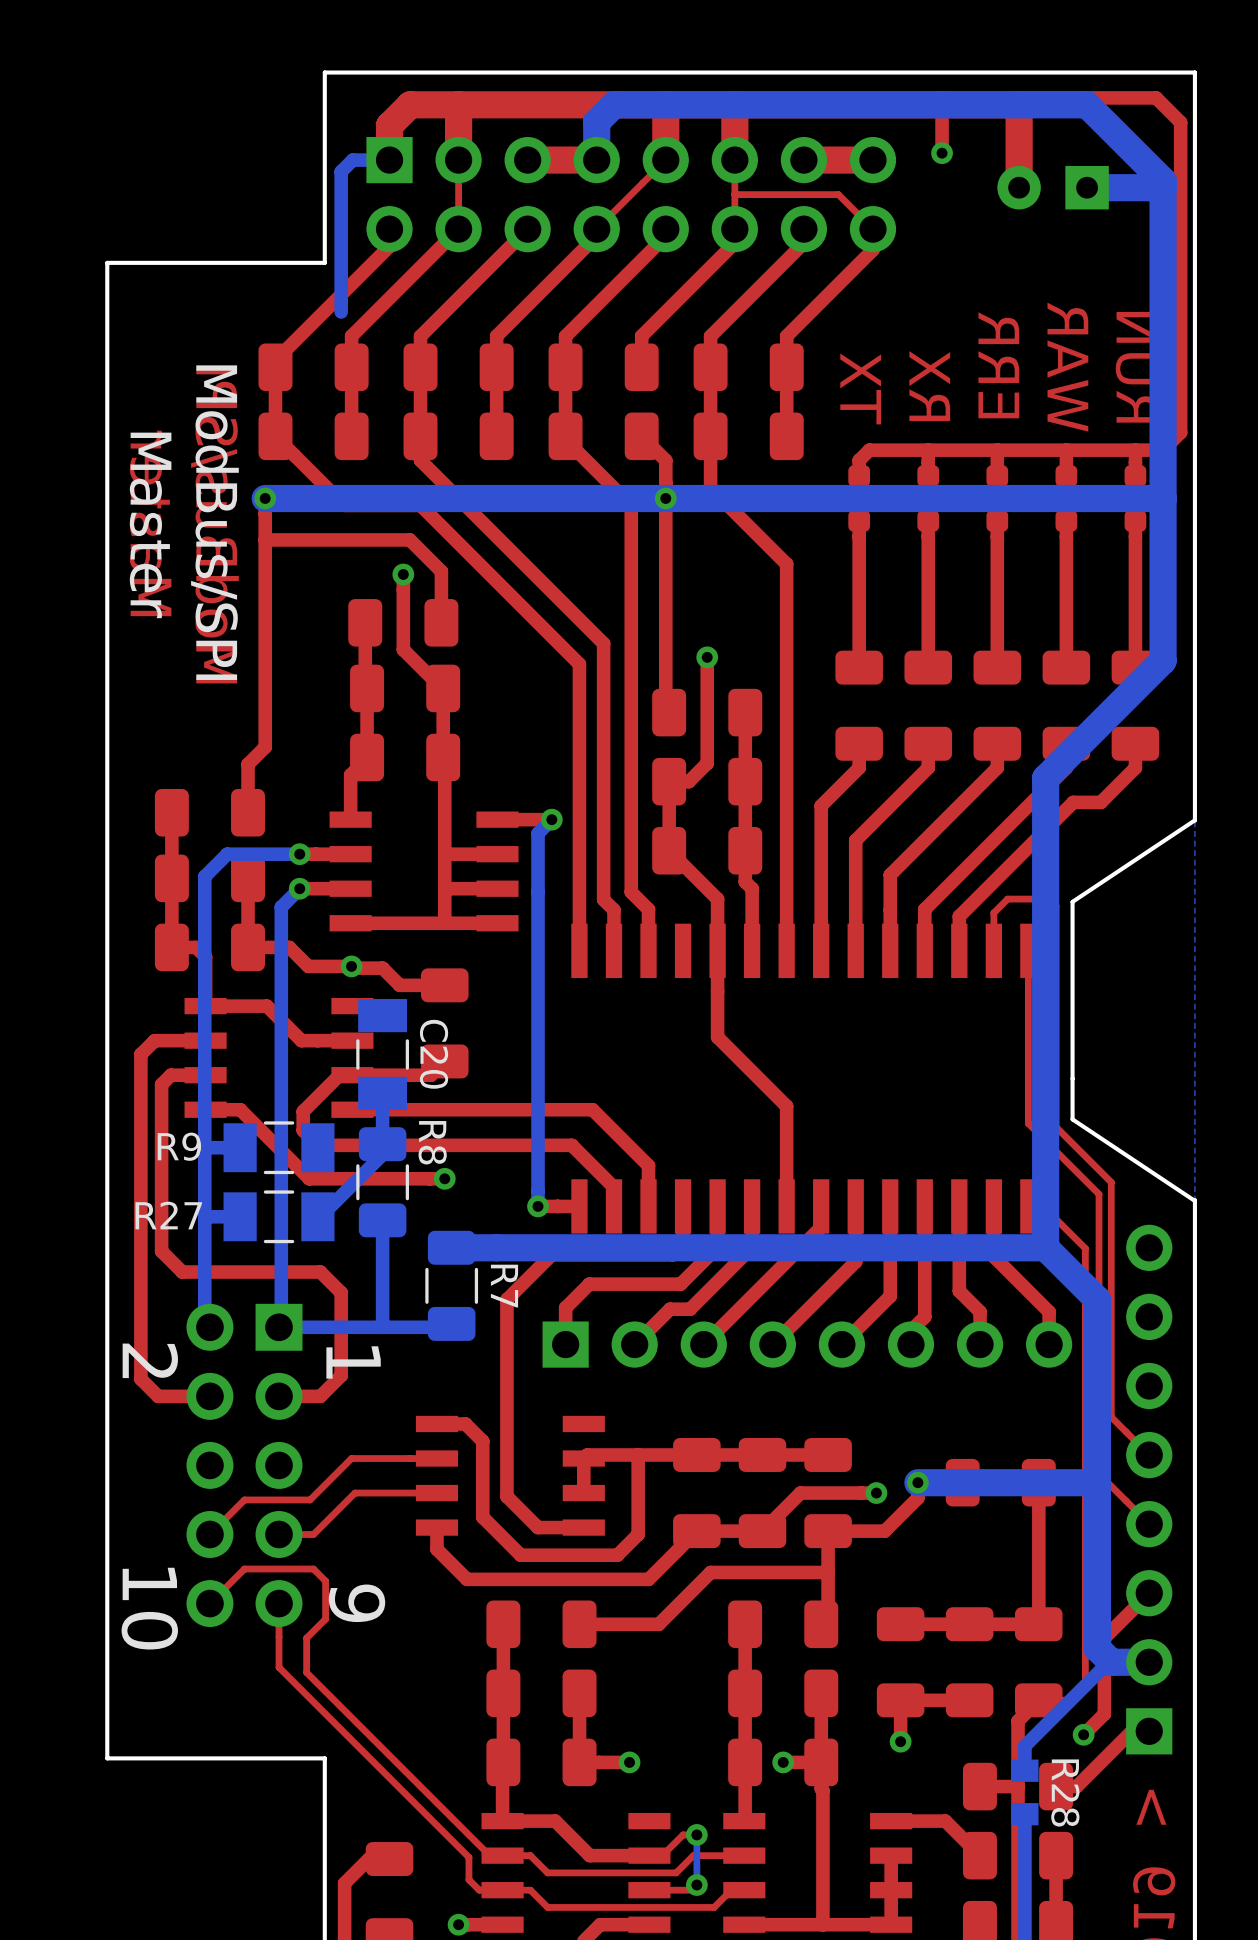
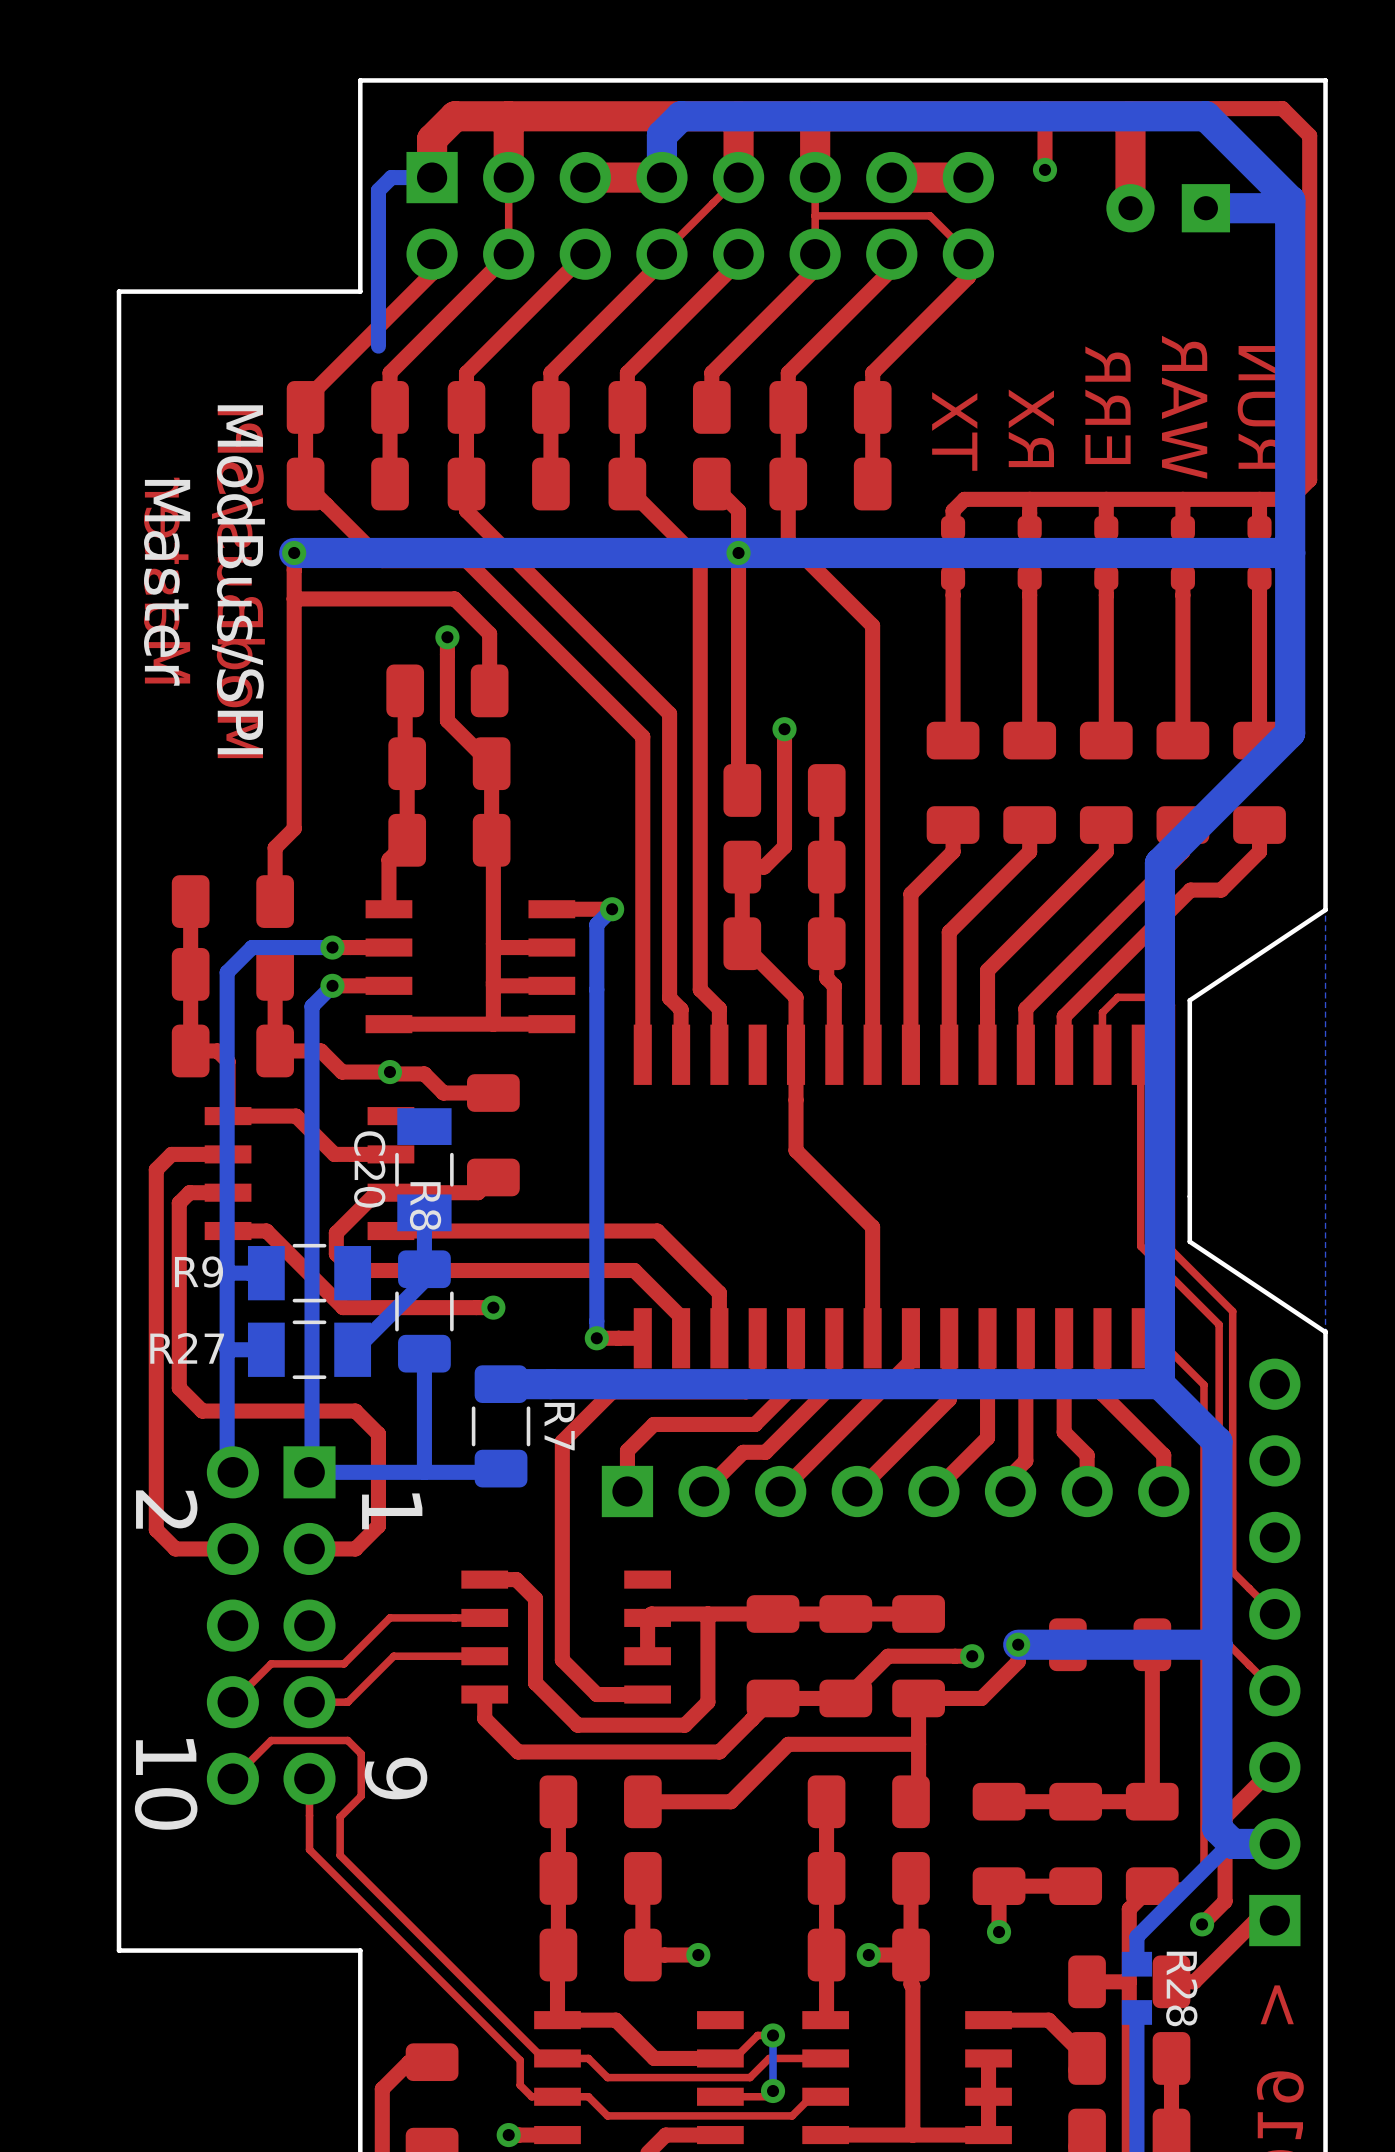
C20 name position: C20 (434, 1054) -> C20 (369, 1169)
R8 name position: R8 (432, 1142) -> R8 (425, 1206)

